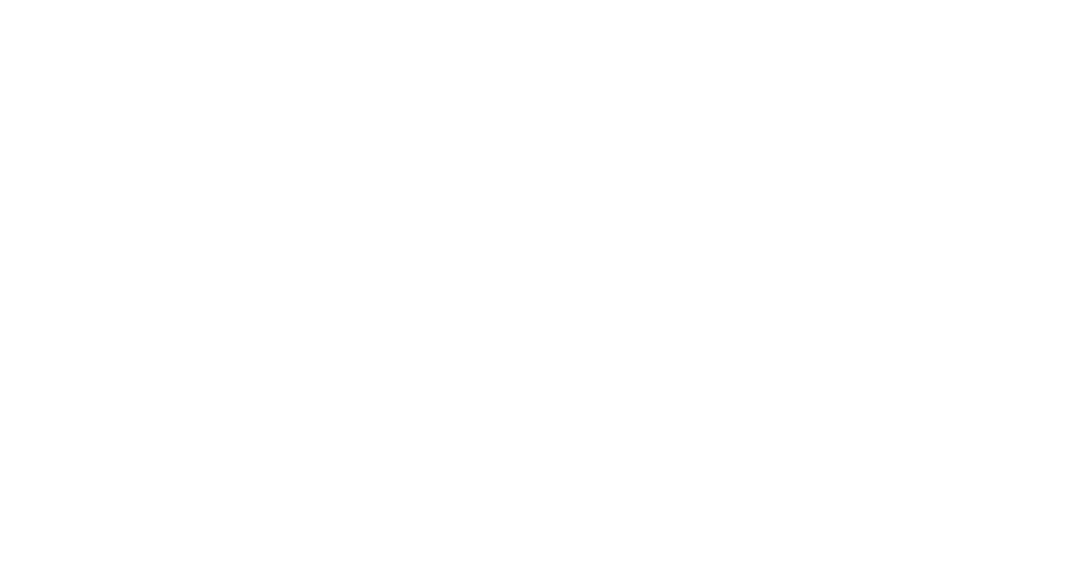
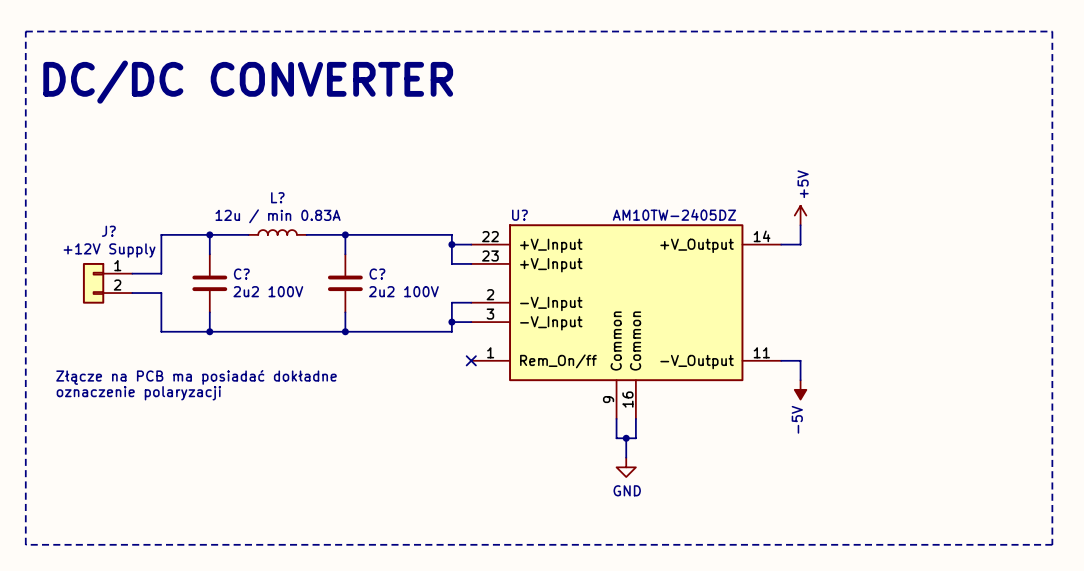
line: none -> (25, 31) (1052, 31) (1052, 544) (25, 544) (25, 31)
text: none -> DC/DC CONVERTER (248, 82)
power symbol: none -> +5V (800, 215)
wire: none -> (800, 225) (800, 244) (781, 244)
L?: none -> 12u / min 0.83A (277, 232)
wire: none -> (209, 234) (209, 254)
junction: none -> (209, 234)
wire: none -> (248, 234) (161, 234) (161, 273) (132, 273)
wire: none -> (306, 234) (451, 234) (451, 263) (471, 263)
wire: none -> (345, 234) (345, 254)
junction: none -> (345, 234)
wire: none -> (451, 244) (471, 244)
junction: none -> (451, 244)
J?: none -> +12V Supply (107, 283)
C?: none -> 2u2 100V (209, 283)
C?: none -> 2u2 100V (345, 283)
wire: none -> (132, 293) (161, 293) (161, 331) (451, 331) (451, 302) (471, 302)
wire: none -> (209, 312) (209, 331)
wire: none -> (345, 312) (345, 331)
U?: none -> AM10TW-2405DZ (626, 321)
wire: none -> (451, 322) (471, 322)
junction: none -> (451, 322)
junction: none -> (209, 331)
junction: none -> (345, 331)
no-connect mark: none -> (471, 360)
wire: none -> (781, 360) (800, 360) (800, 380)
text: none -> Złącze na PCB ma posiadać dokładne (196, 377)
power symbol: none -> -5V (800, 389)
text: none -> oznaczenie polaryzacji (138, 393)
wire: none -> (616, 418) (616, 438) (635, 438) (635, 418)
wire: none -> (626, 438) (626, 457)
junction: none -> (626, 438)
power symbol: none -> GND (626, 467)

